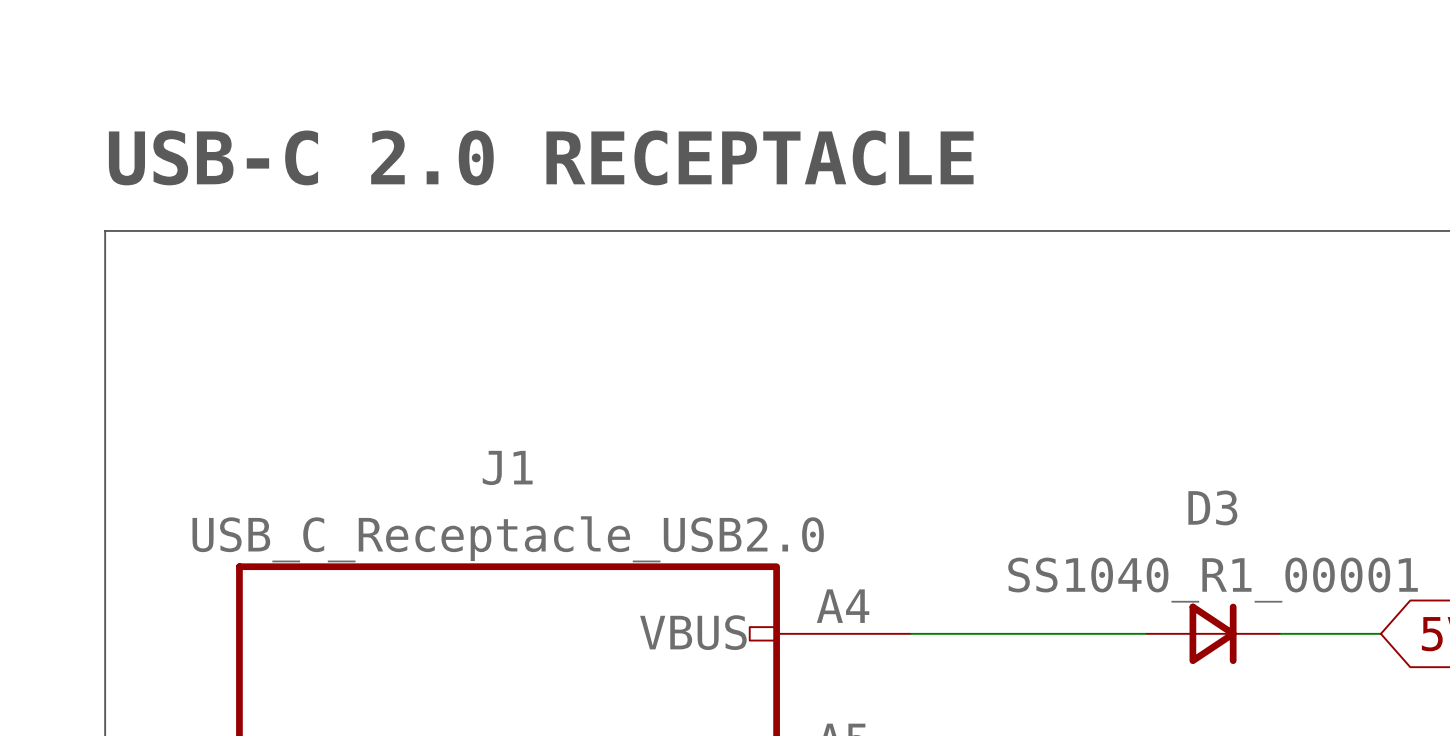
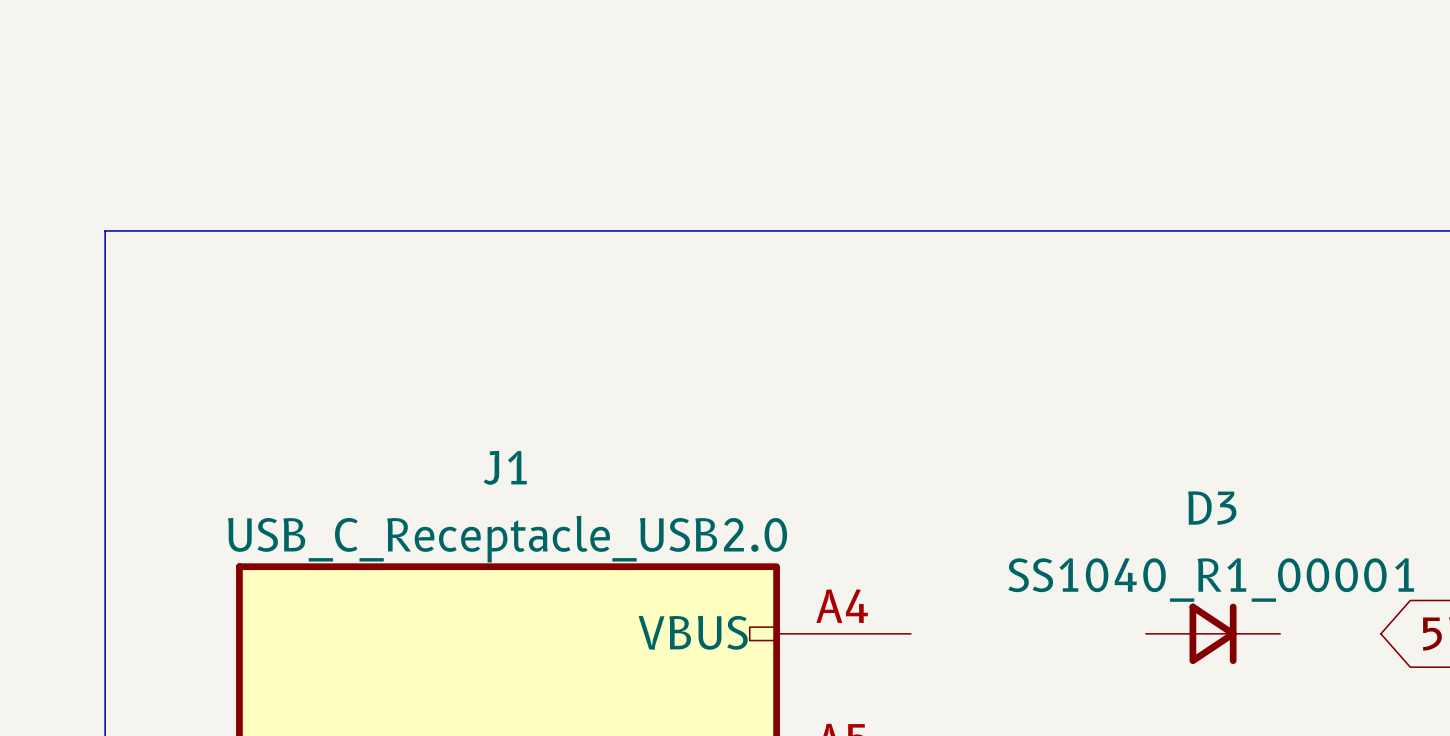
text: USB-C 2.0 RECEPTACLE (541, 157) -> none
wire: (910, 633) (1145, 633) -> none
wire: (1280, 633) (1380, 633) -> none

